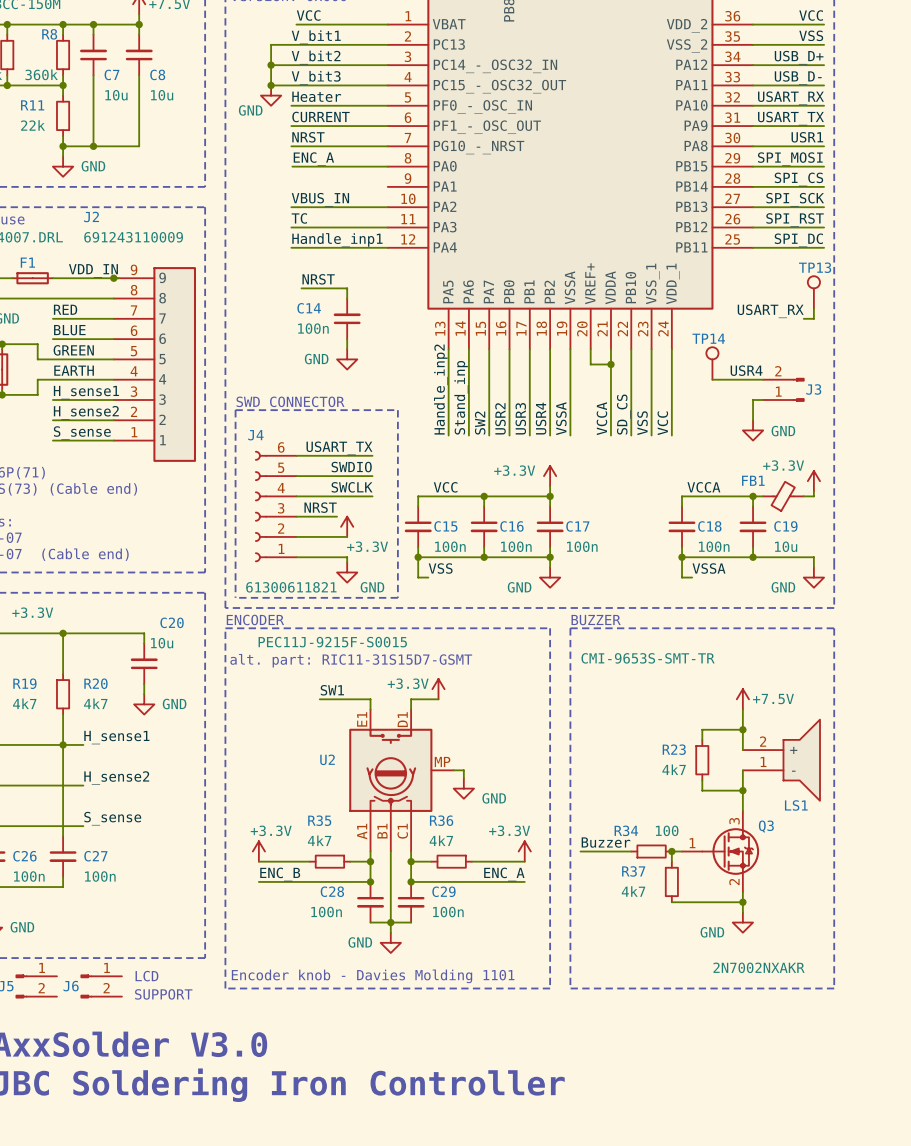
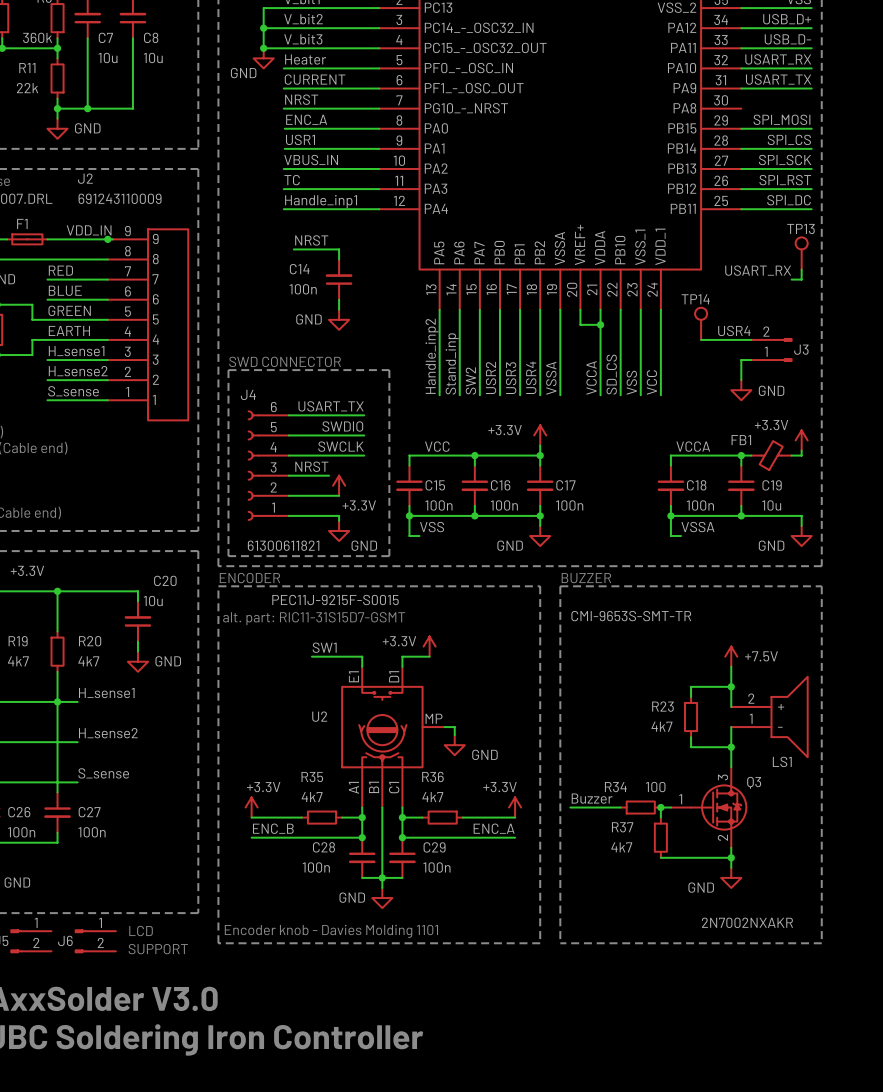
label: USR1 (807, 137) -> none
wire: (753, 146) (824, 146) -> none
label: none -> USR1 (300, 139)
wire: none -> (284, 148) (379, 148)

